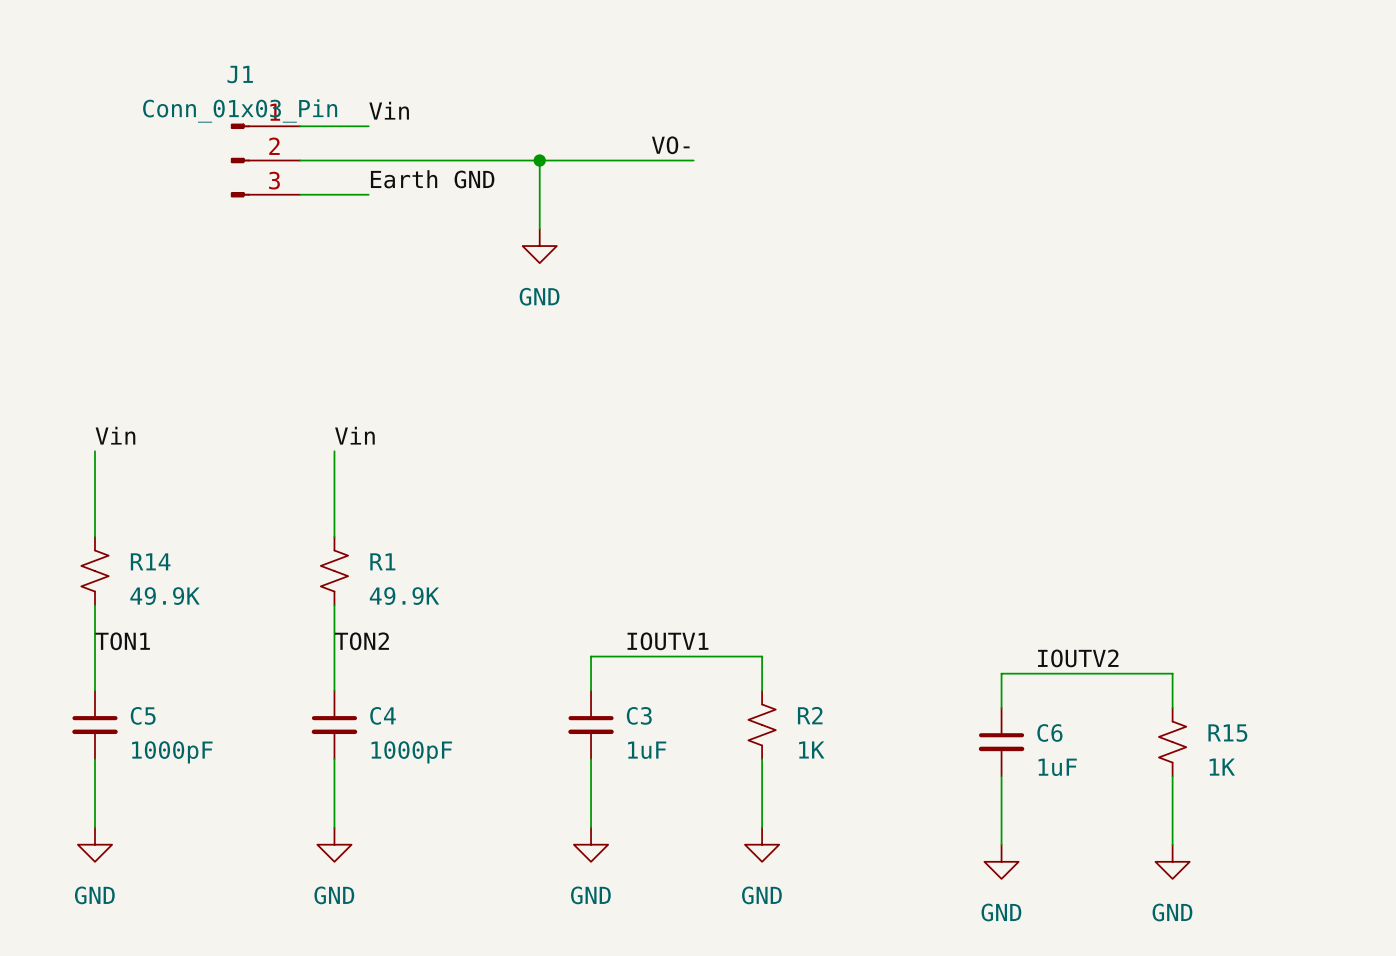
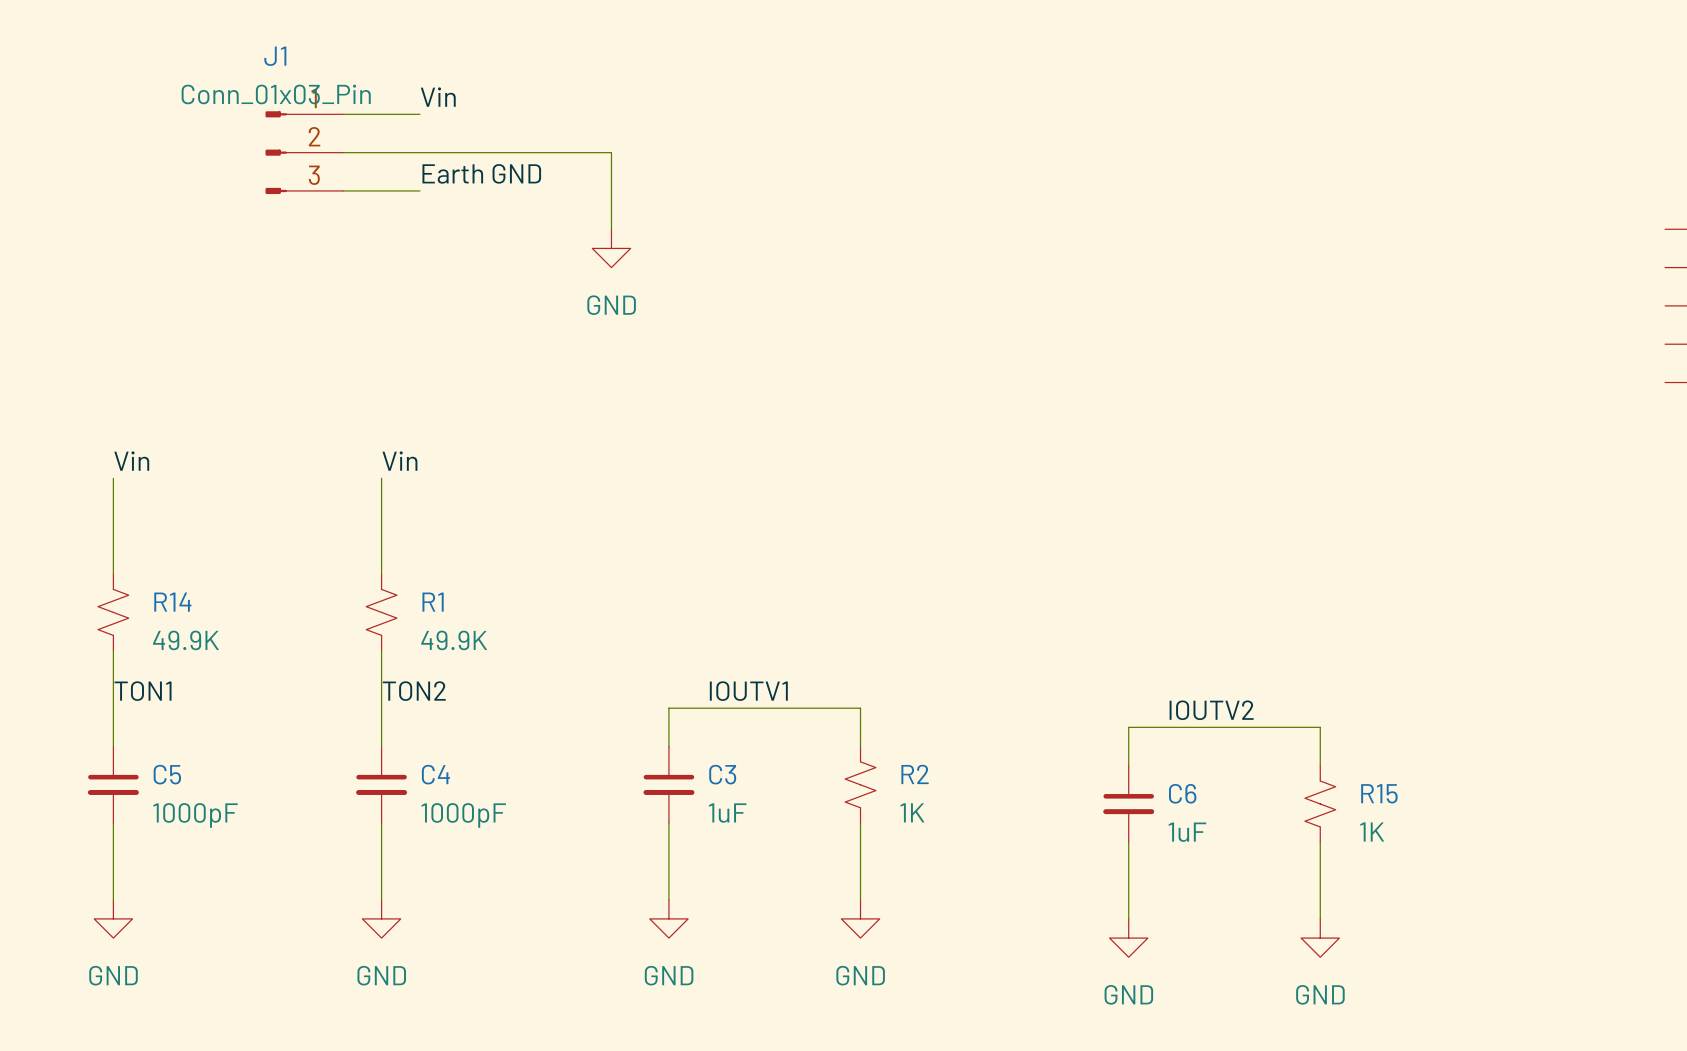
label: VO- (670, 145) -> none
wire: (539, 160) (693, 160) -> none
junction: (539, 160) -> none

